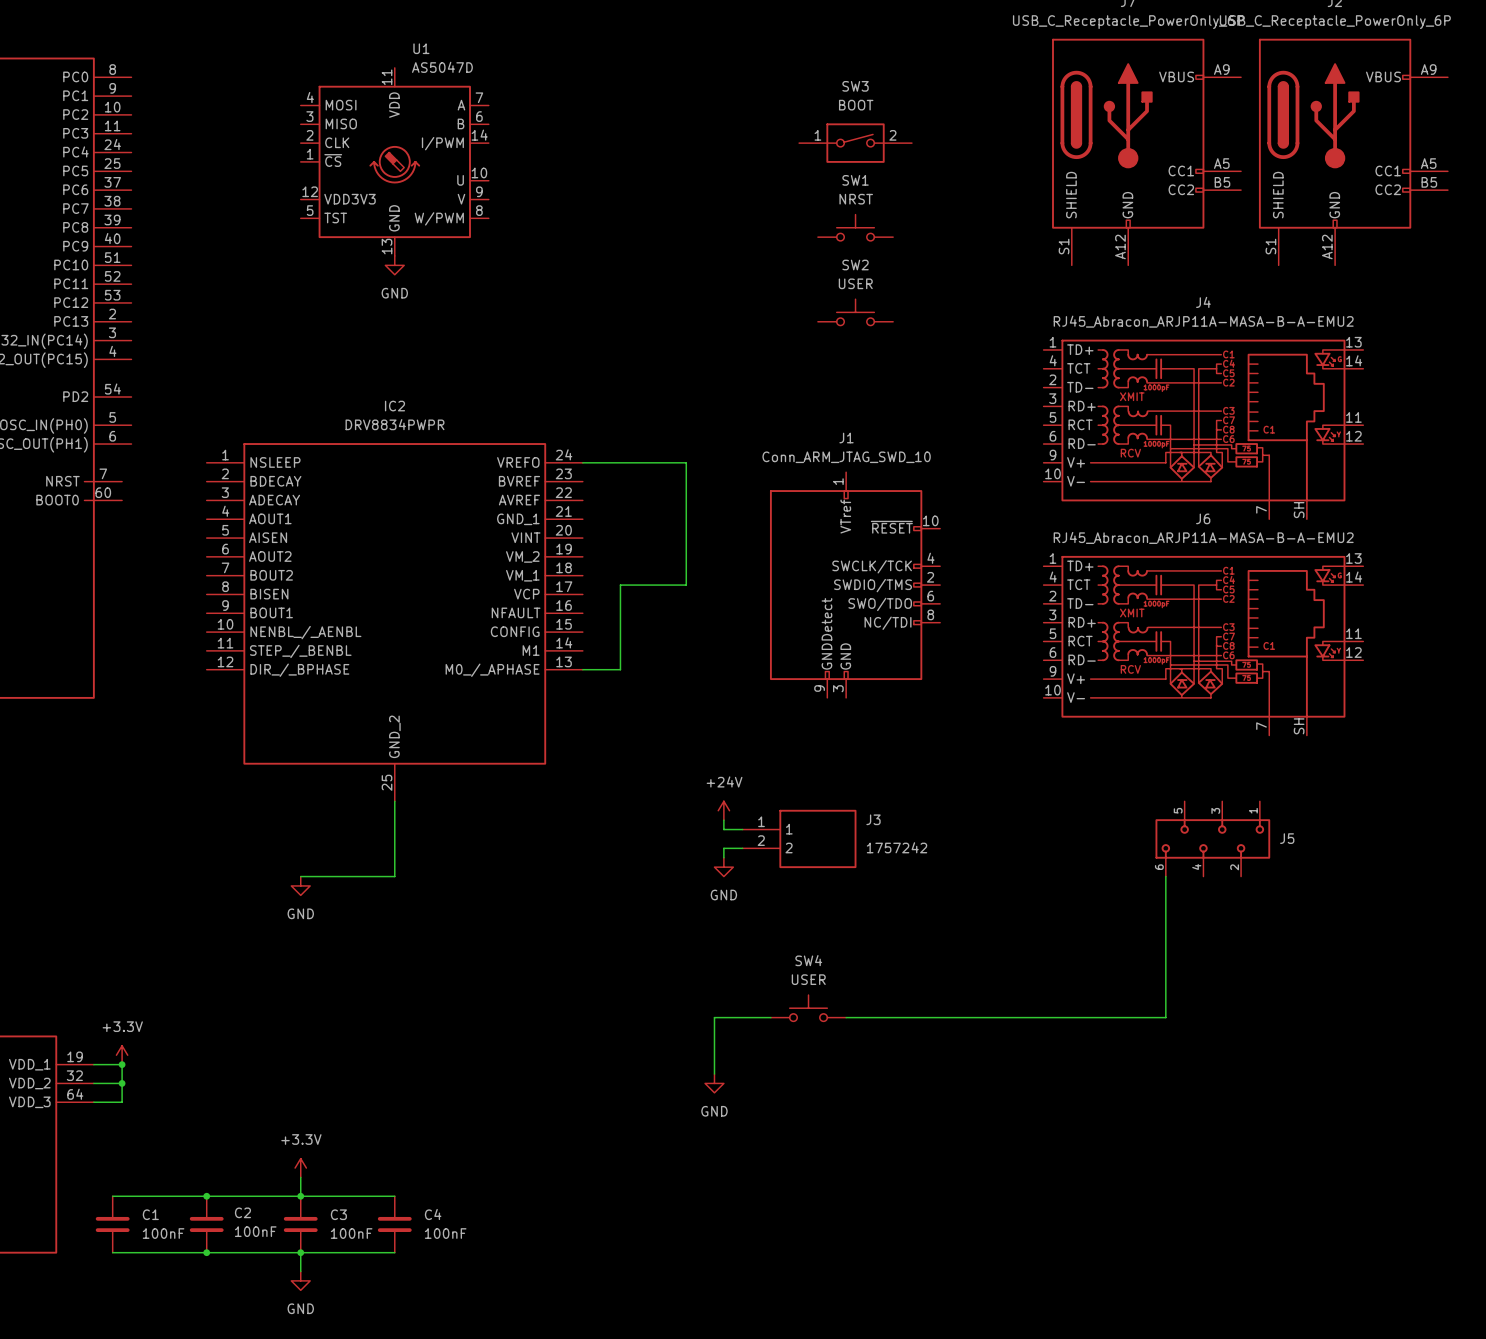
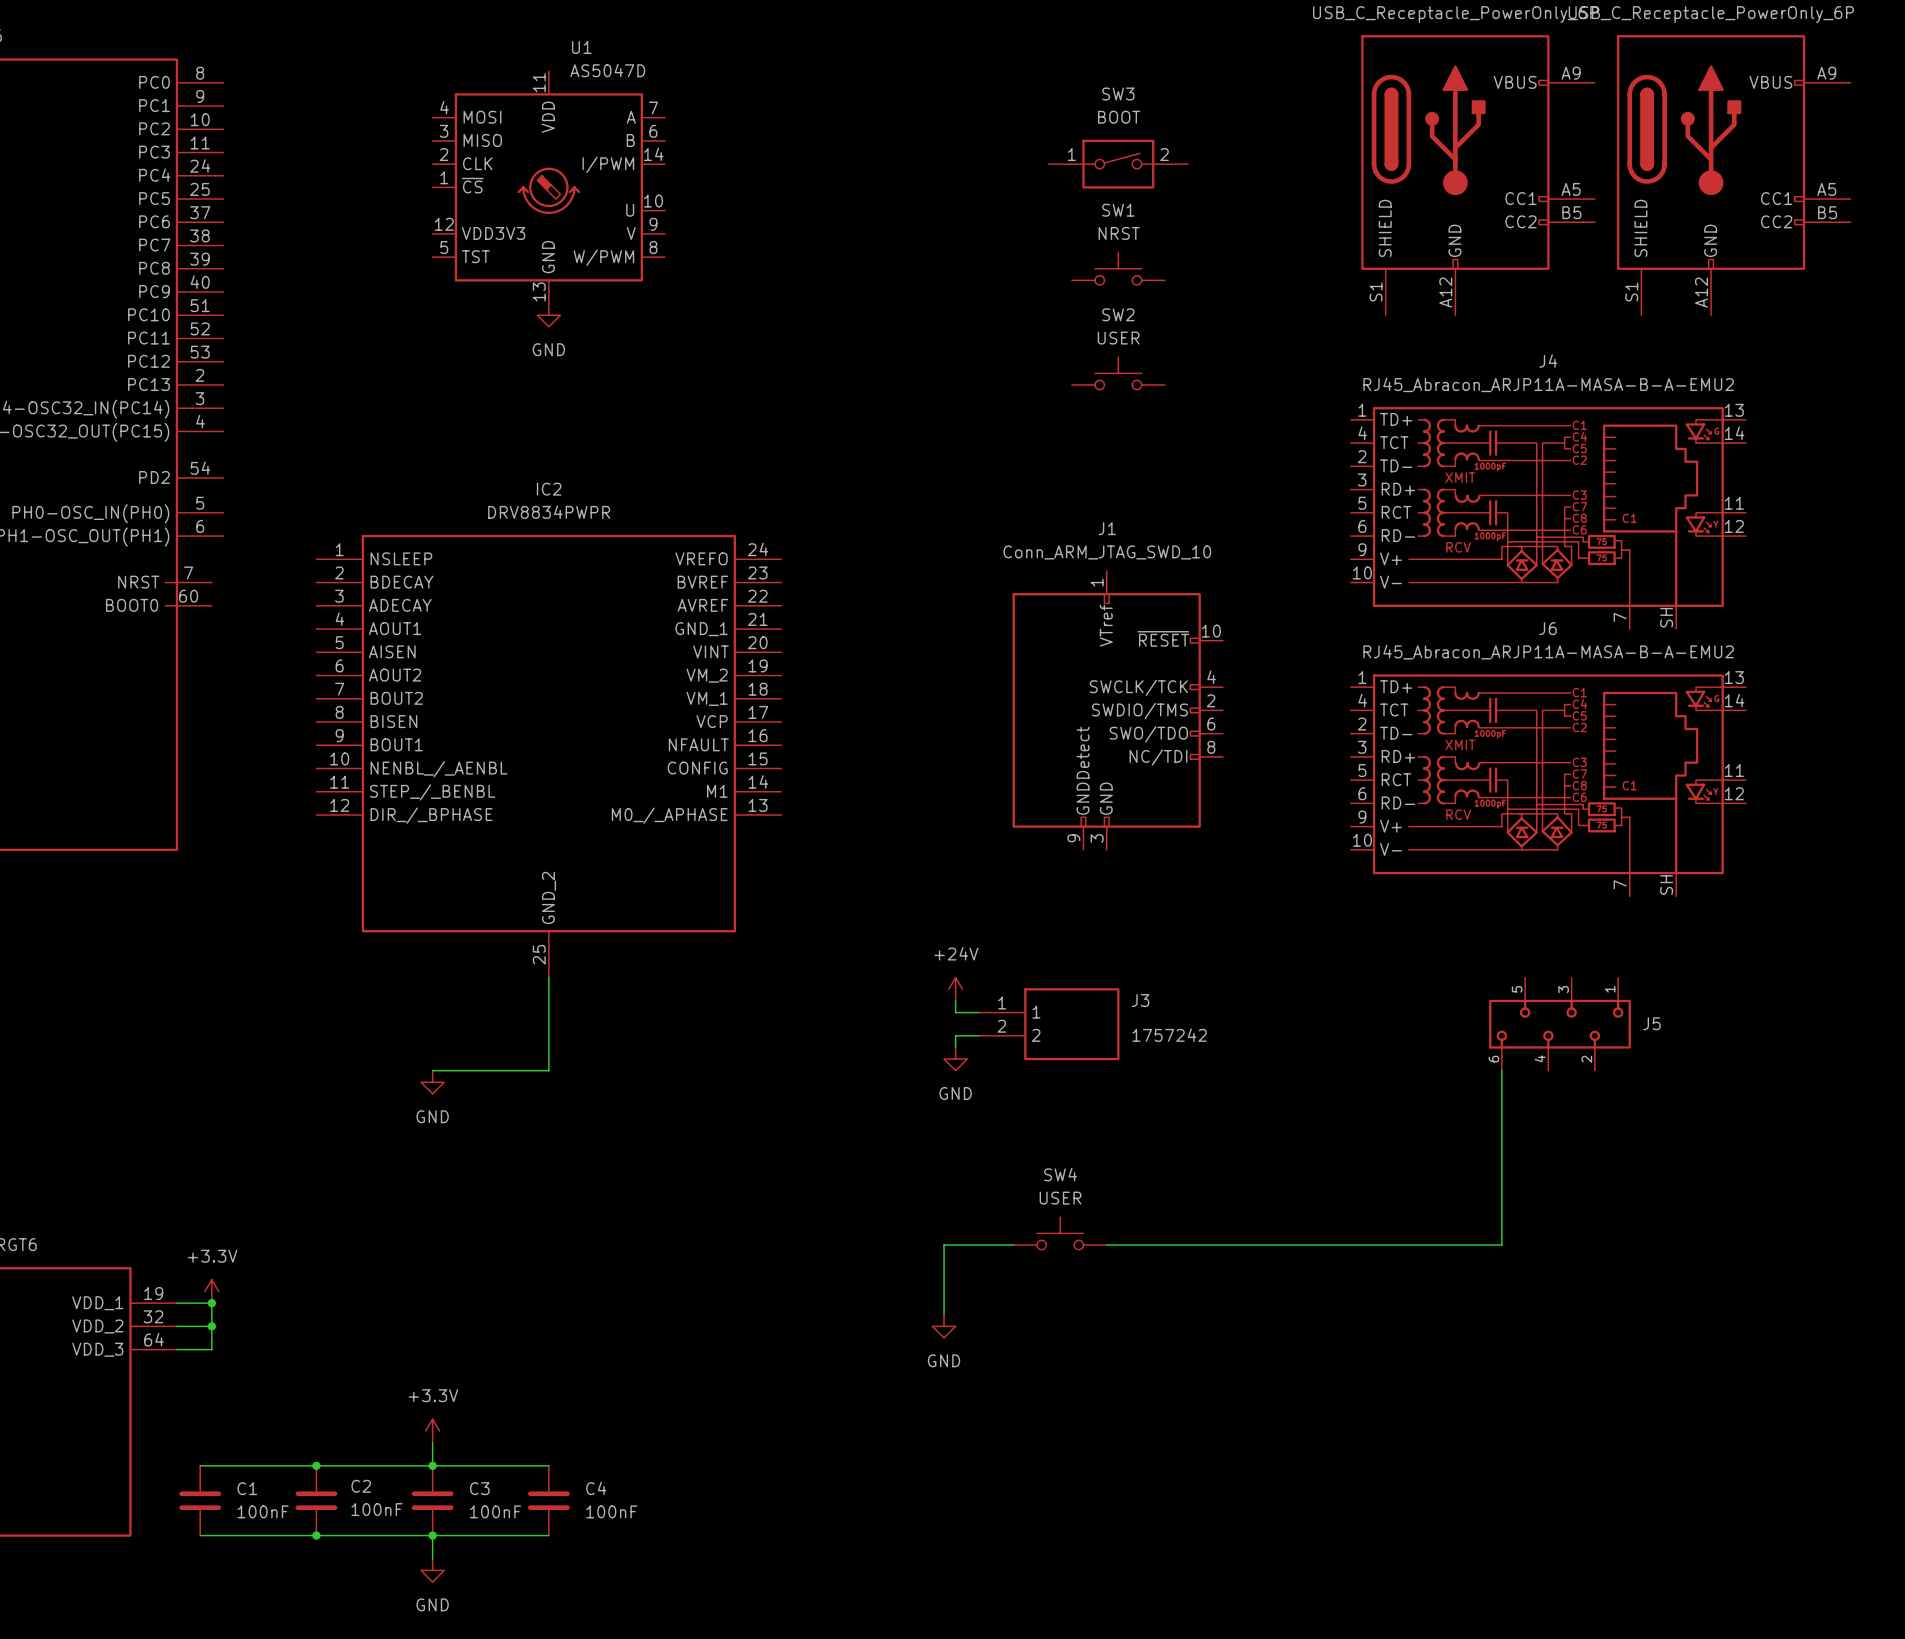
wire: (582, 462) (686, 462) (686, 585) (620, 585) (620, 669) (582, 669) -> none

